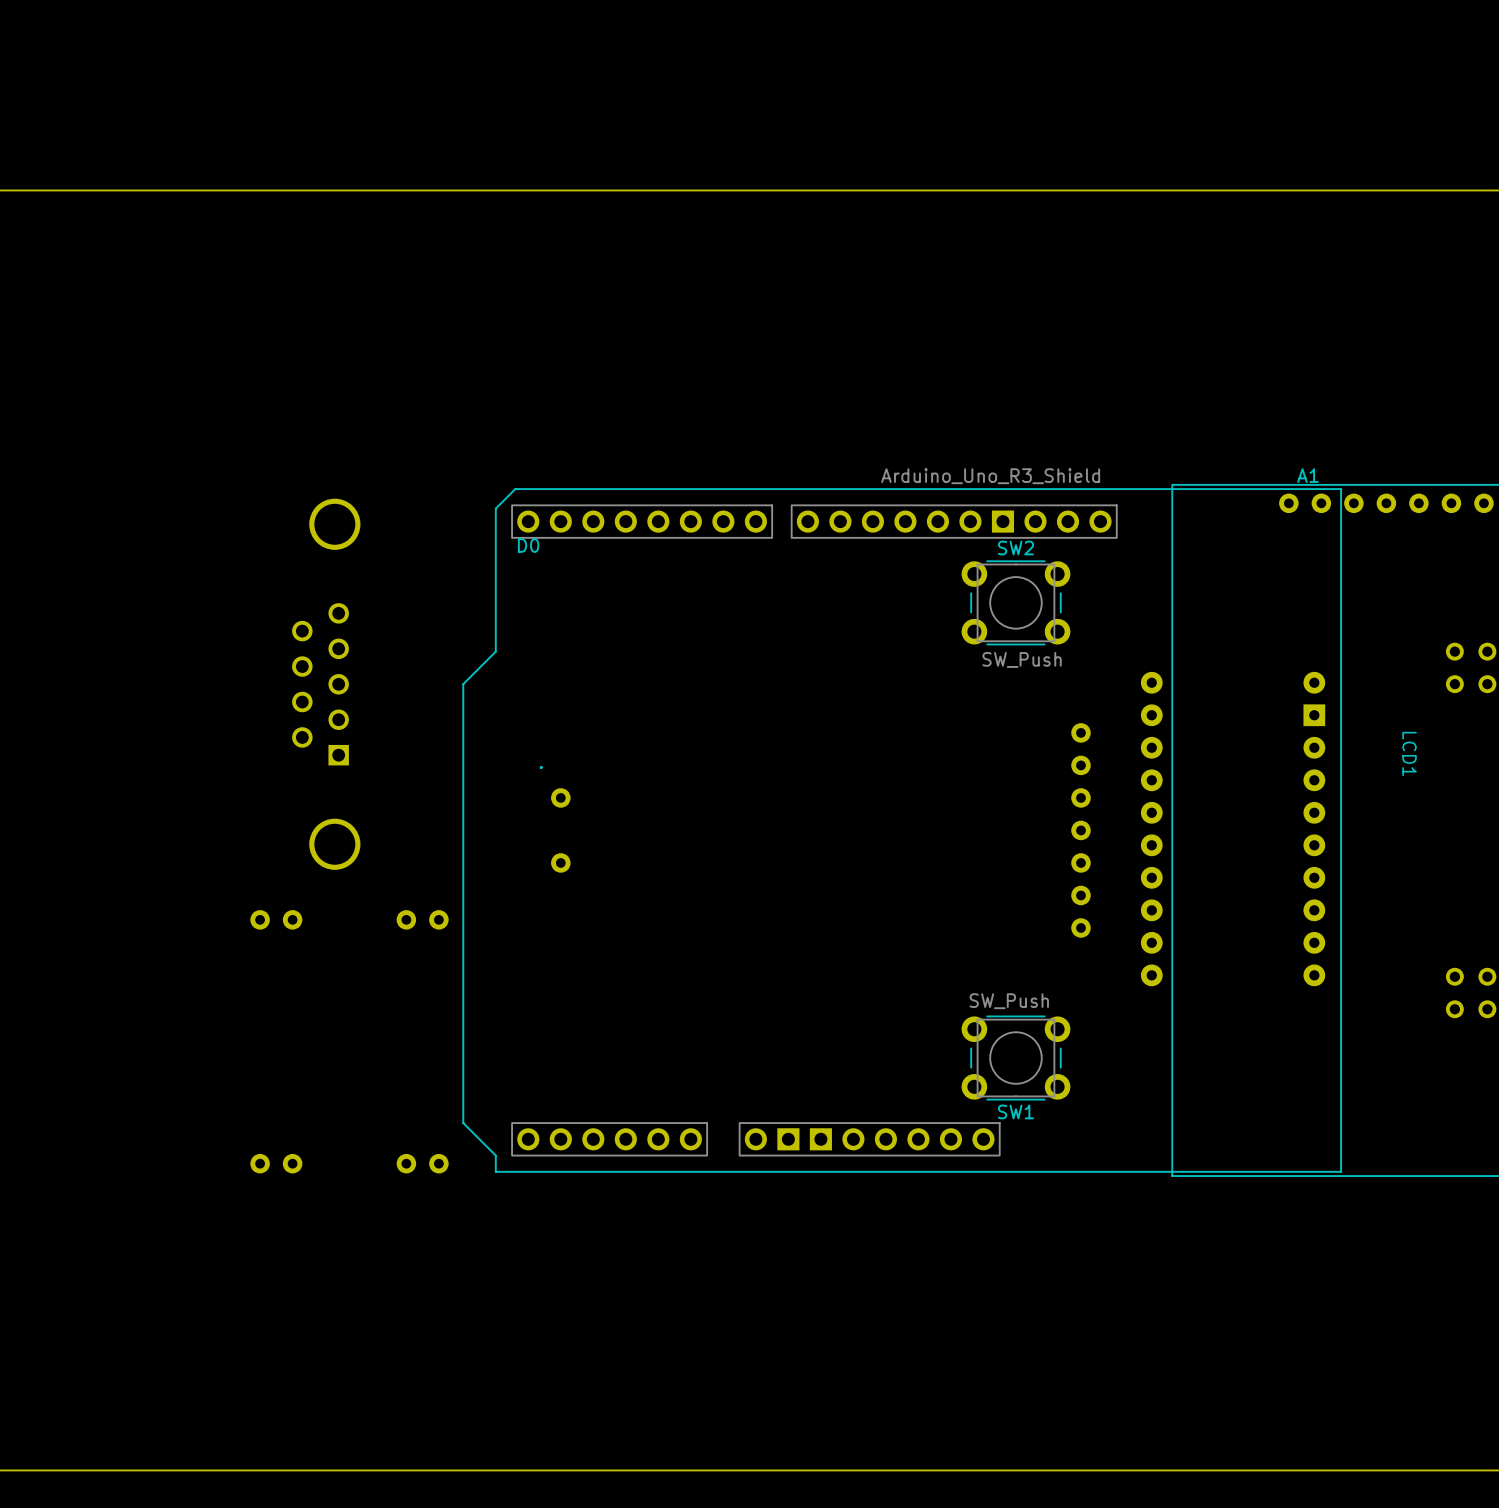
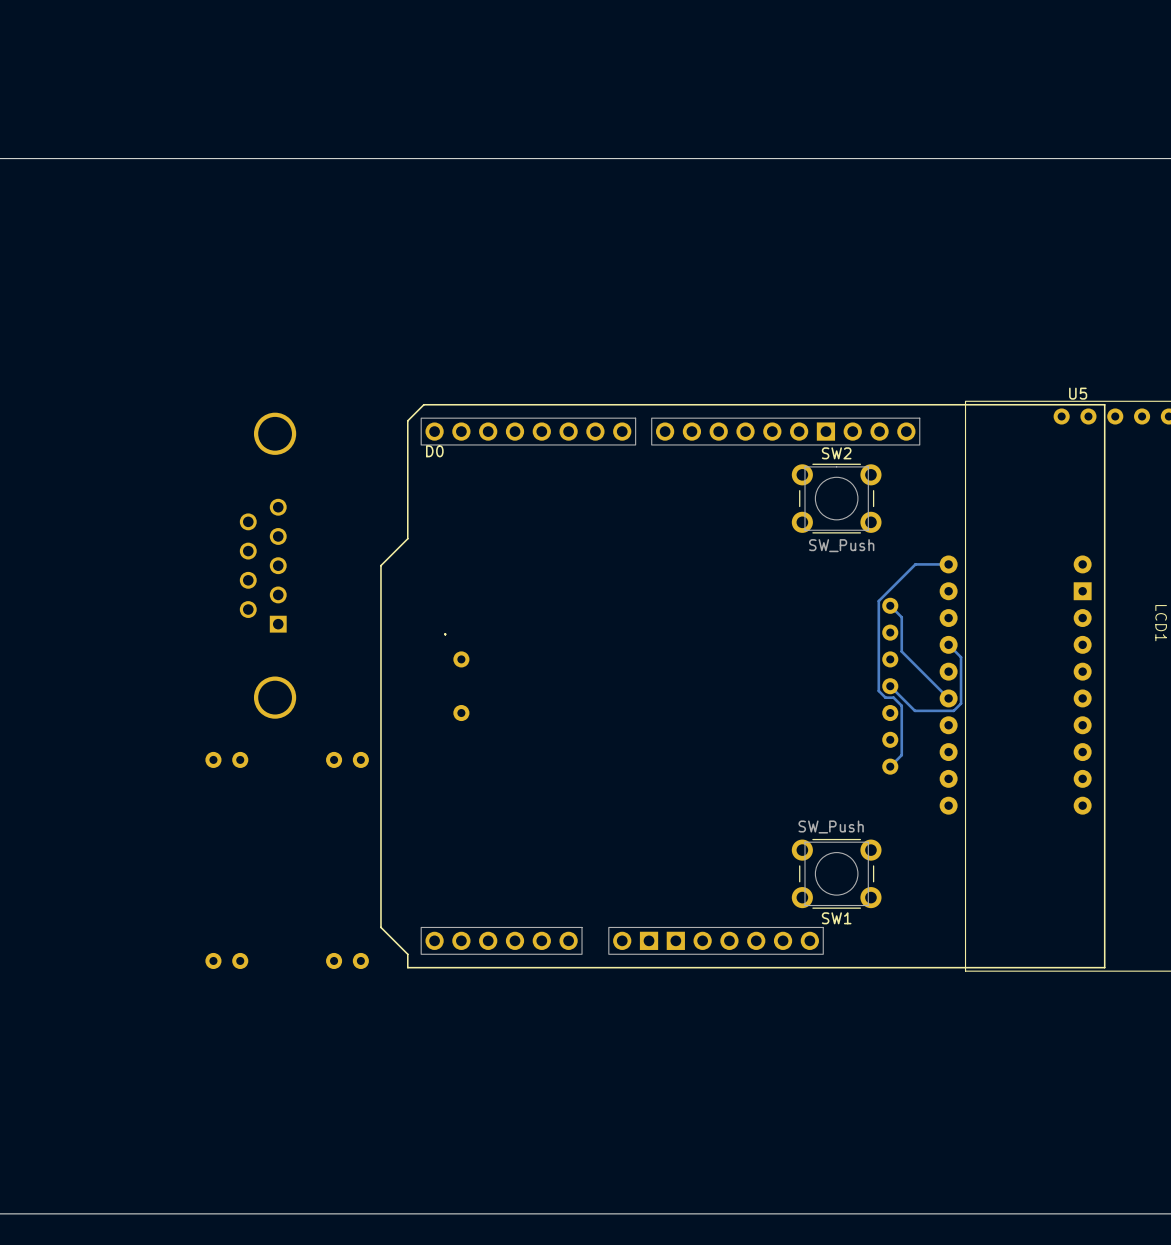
A1 name: A1 (1307, 475) -> U5 (1078, 393)
A1 value: Arduino_Uno_R3_Shield (990, 476) -> none
track: none -> (948, 564) (915, 564) (878, 601) (878, 690) (885, 697) (893, 697) (901, 705) (901, 755) (890, 766)
track: none -> (890, 605) (901, 617) (901, 651) (948, 698)
track: none -> (948, 644) (961, 657) (961, 703) (953, 710) (914, 710) (890, 686)

